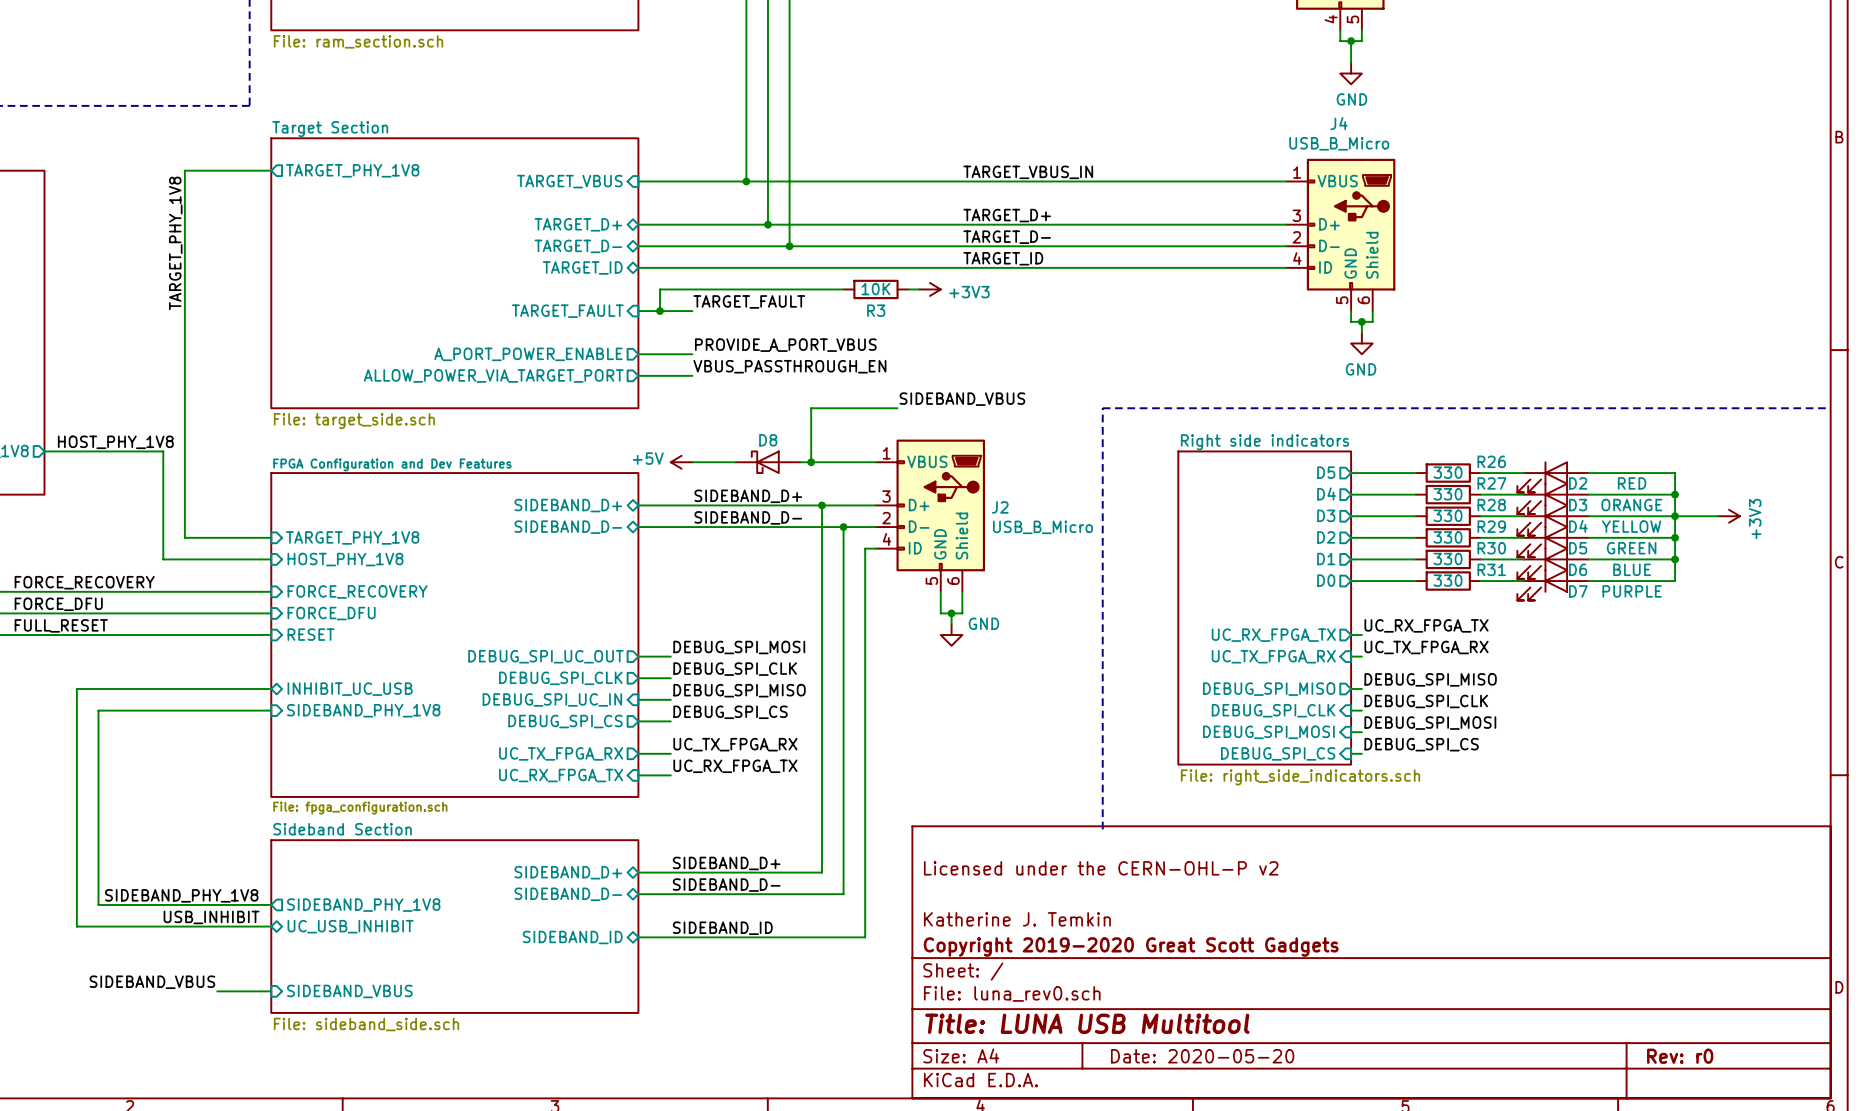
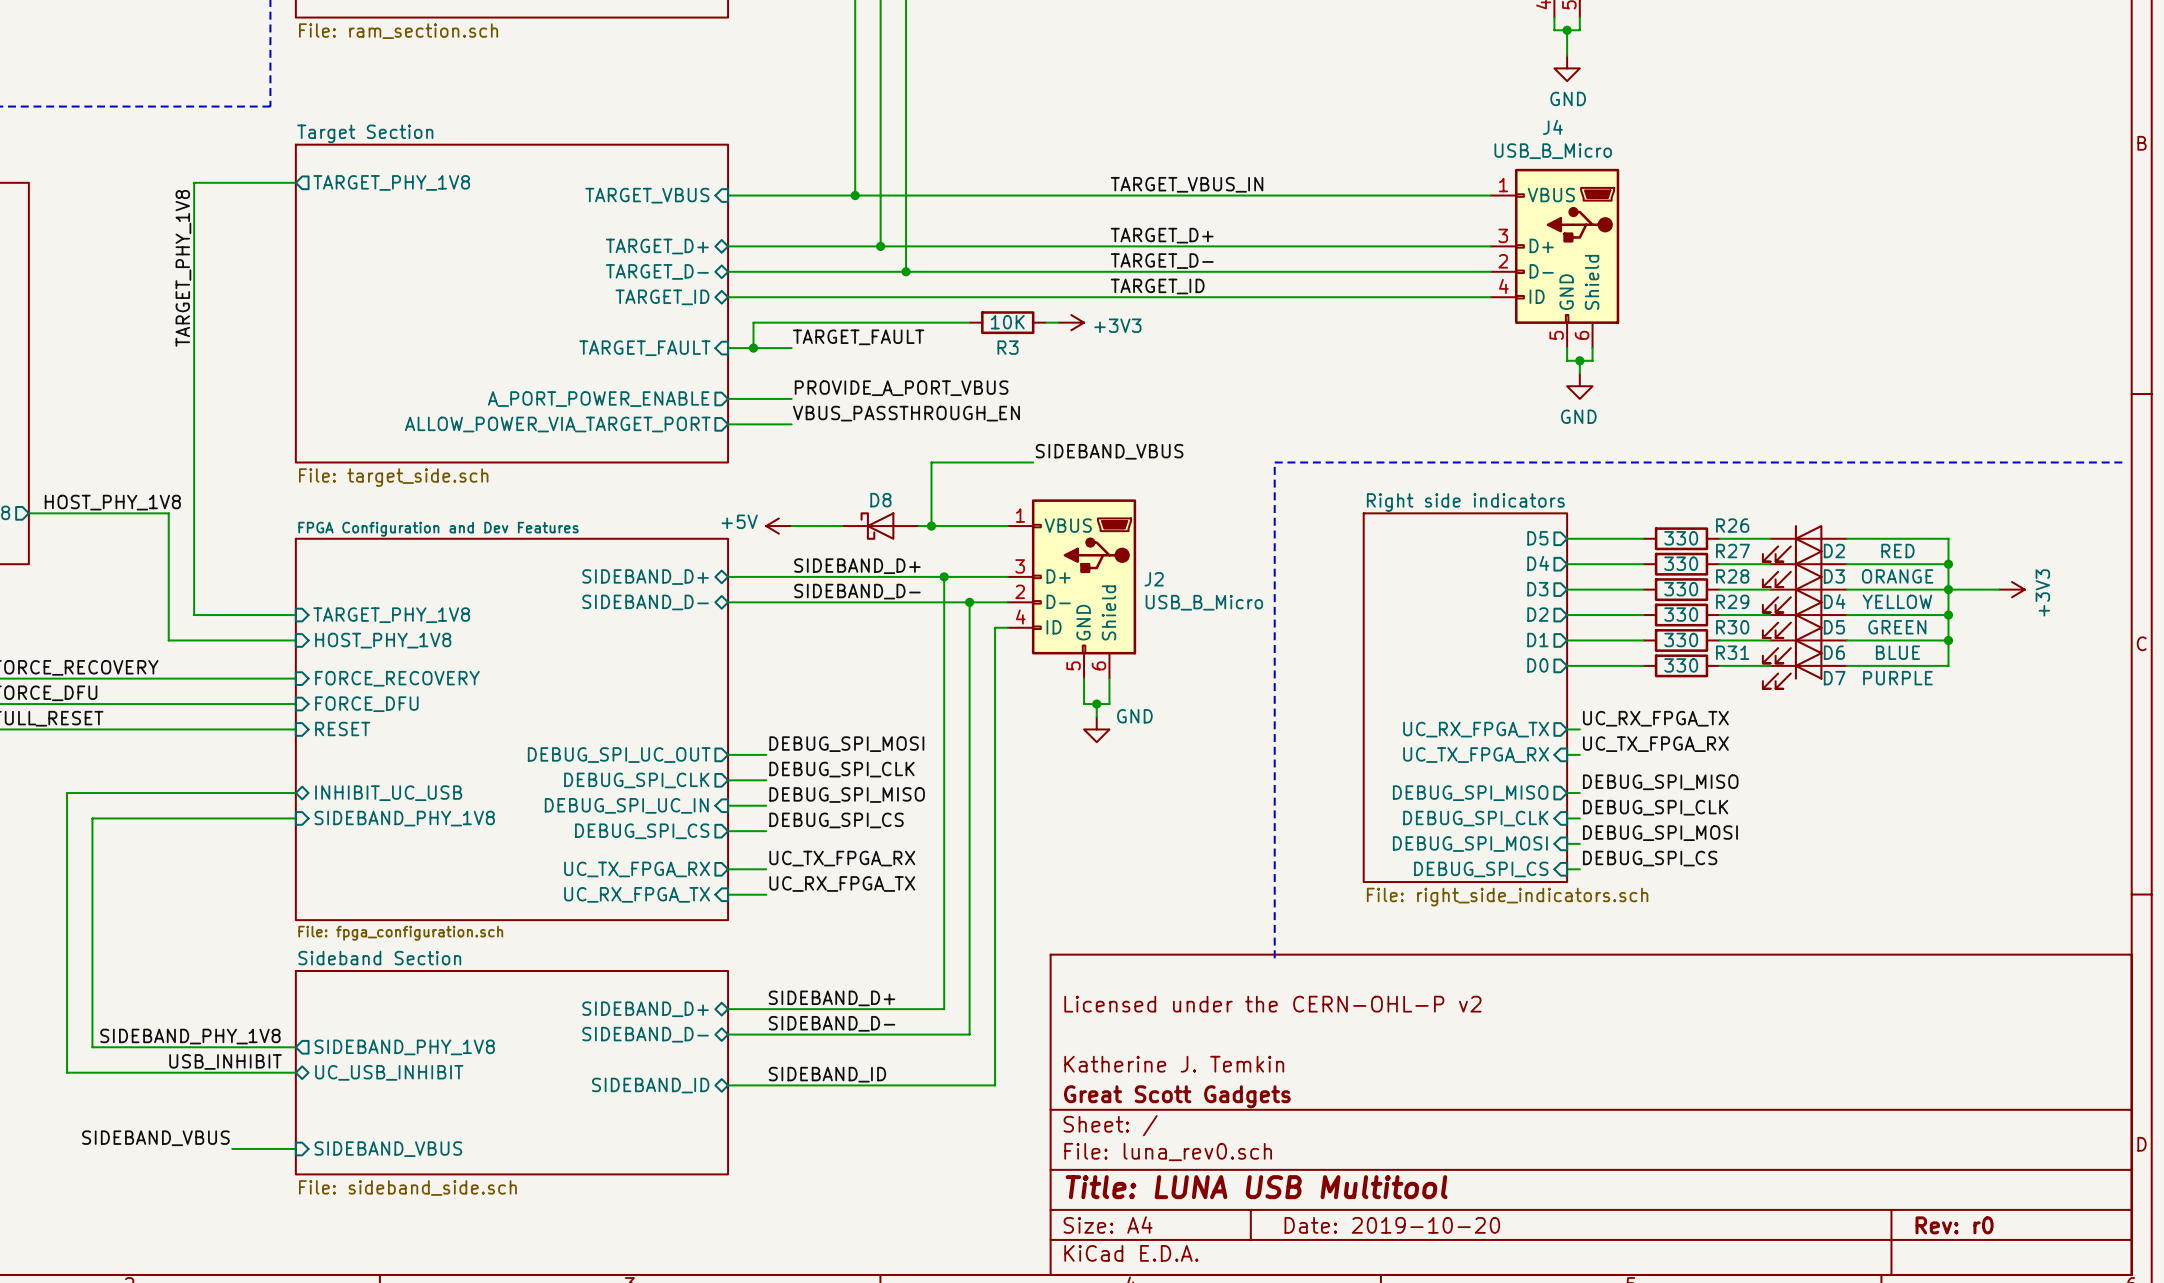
title block: Copyright 2019-2020 Great Scott Gadgets (1131, 946) -> Great Scott Gadgets (1177, 1096)
title block: Date: 2020-05-20 (1202, 1056) -> Date: 2019-10-20 (1392, 1225)

